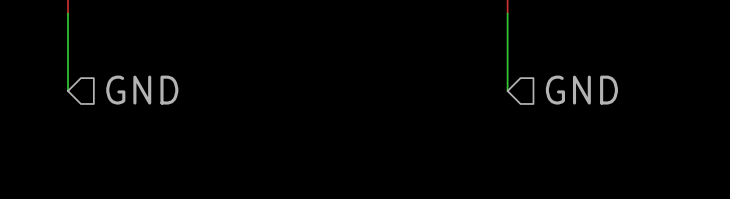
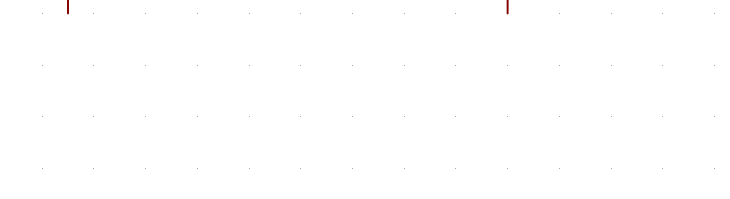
wire: (68, 13) (68, 91) -> none
wire: (507, 13) (507, 91) -> none
hierarchical label: GND (142, 90) -> none
hierarchical label: GND (581, 90) -> none

